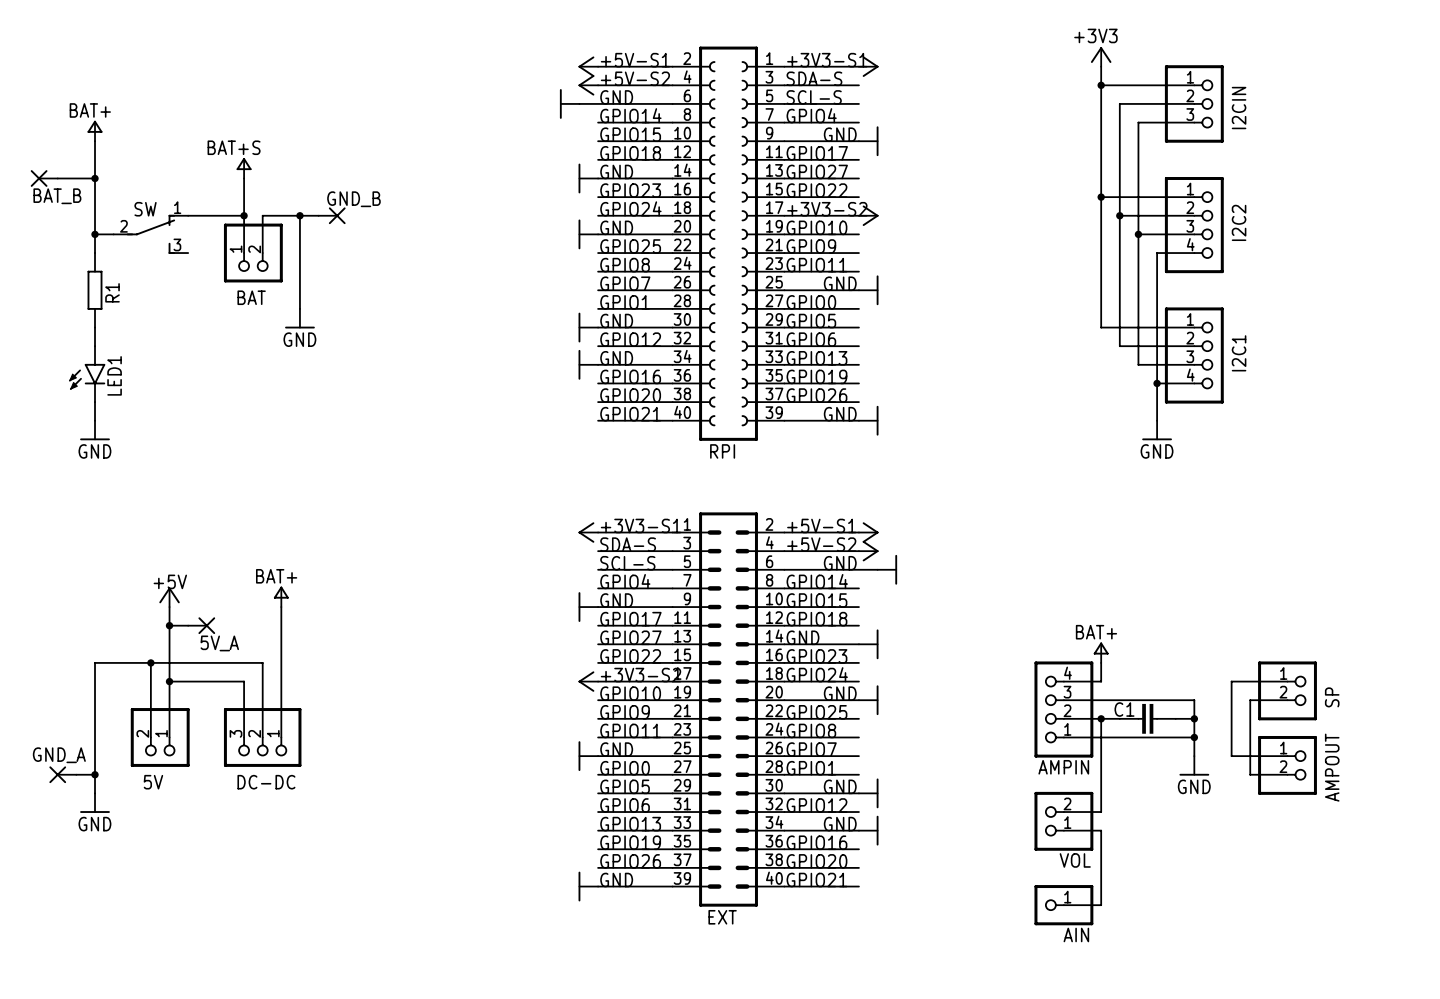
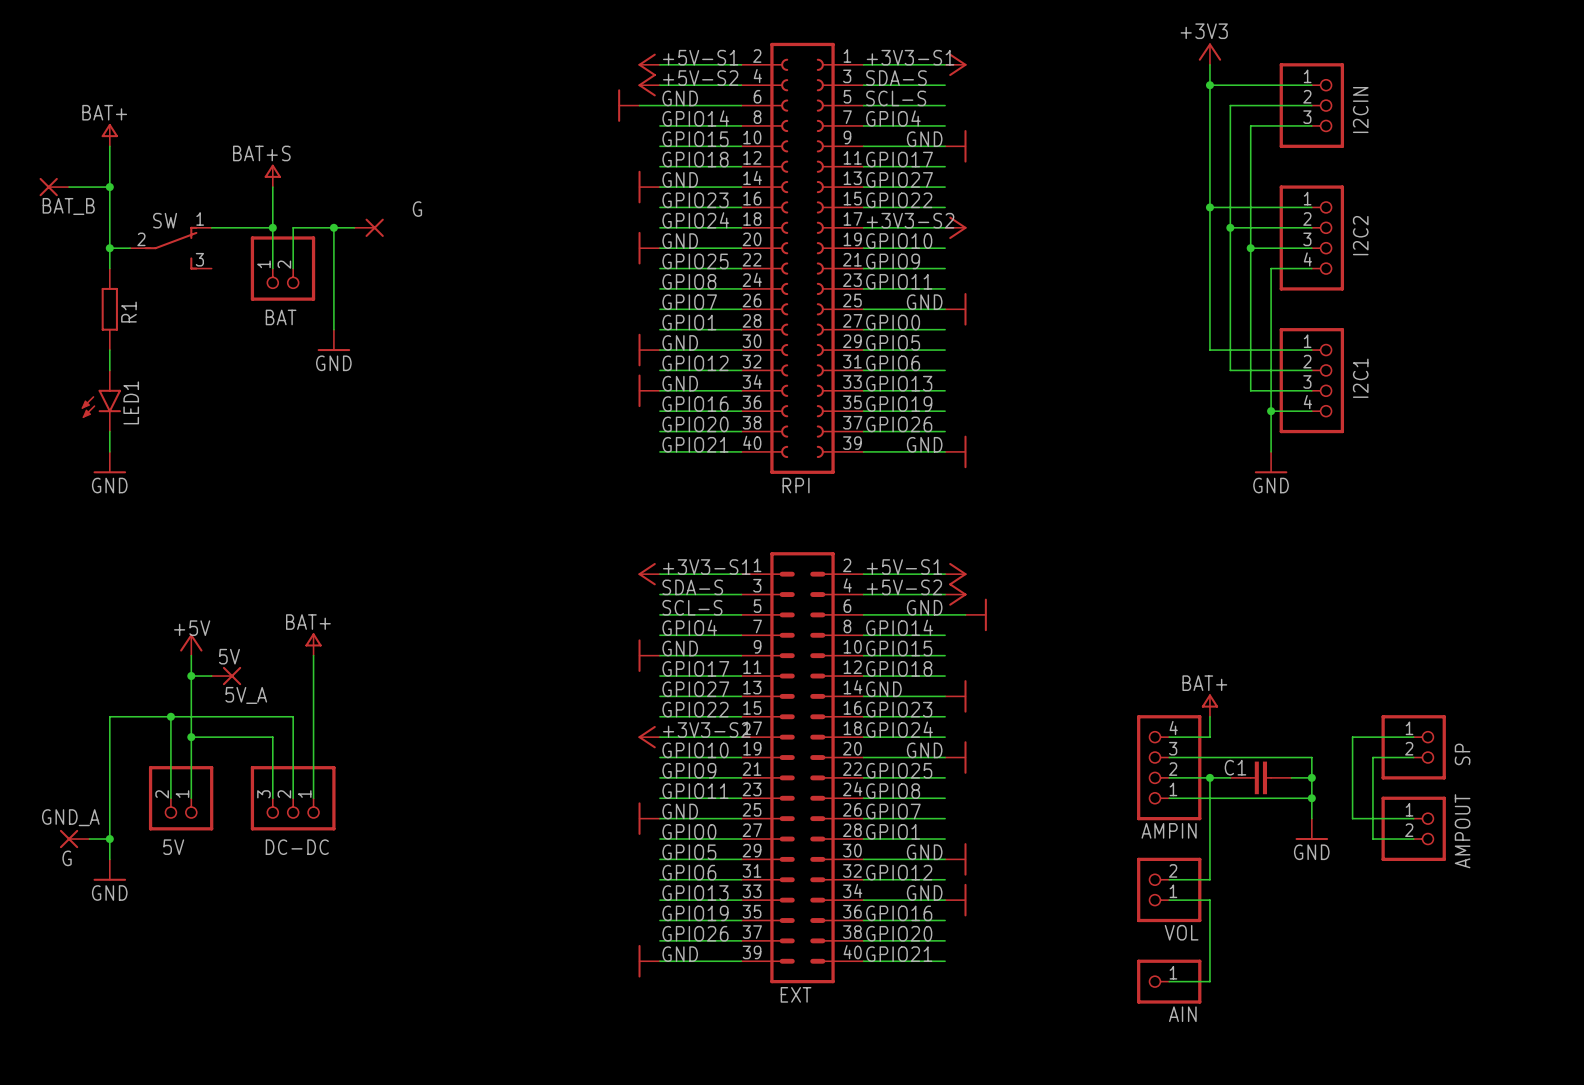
GND_B name: GND_B (353, 199) -> G (417, 209)
5V_A value: none -> 5V (229, 656)
GND_A value: none -> G (67, 858)

